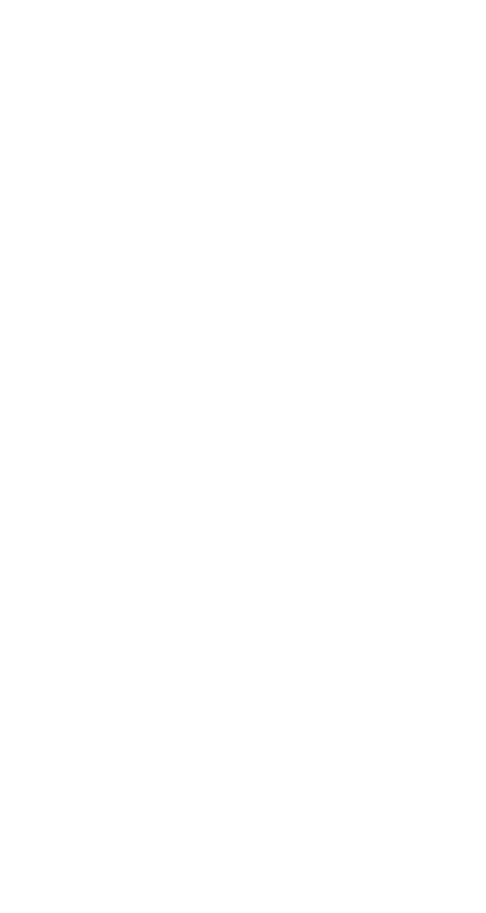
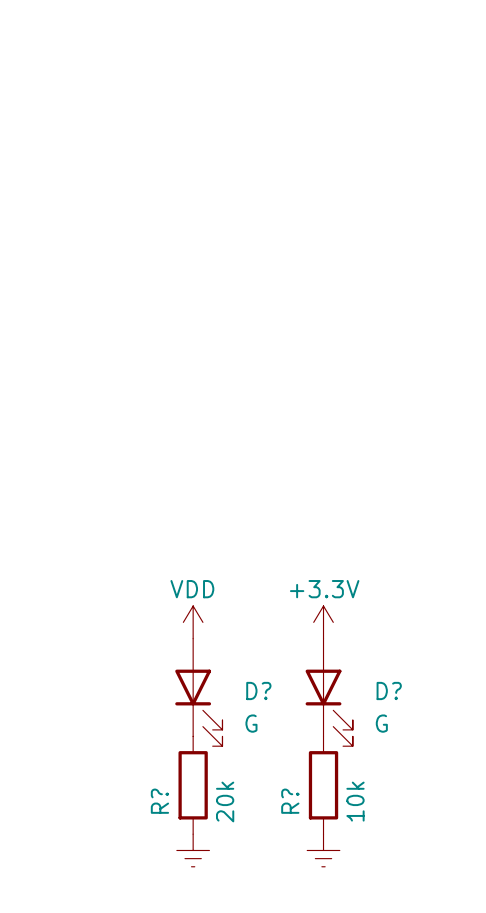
power symbol: none -> VDD (193, 622)
power symbol: none -> +3.3V (323, 622)
D?: none -> G (198, 692)
D?: none -> G (329, 692)
R?: none -> 20k (193, 785)
R?: none -> 10k (323, 785)
power symbol: none -> (193, 850)
power symbol: none -> (323, 850)

